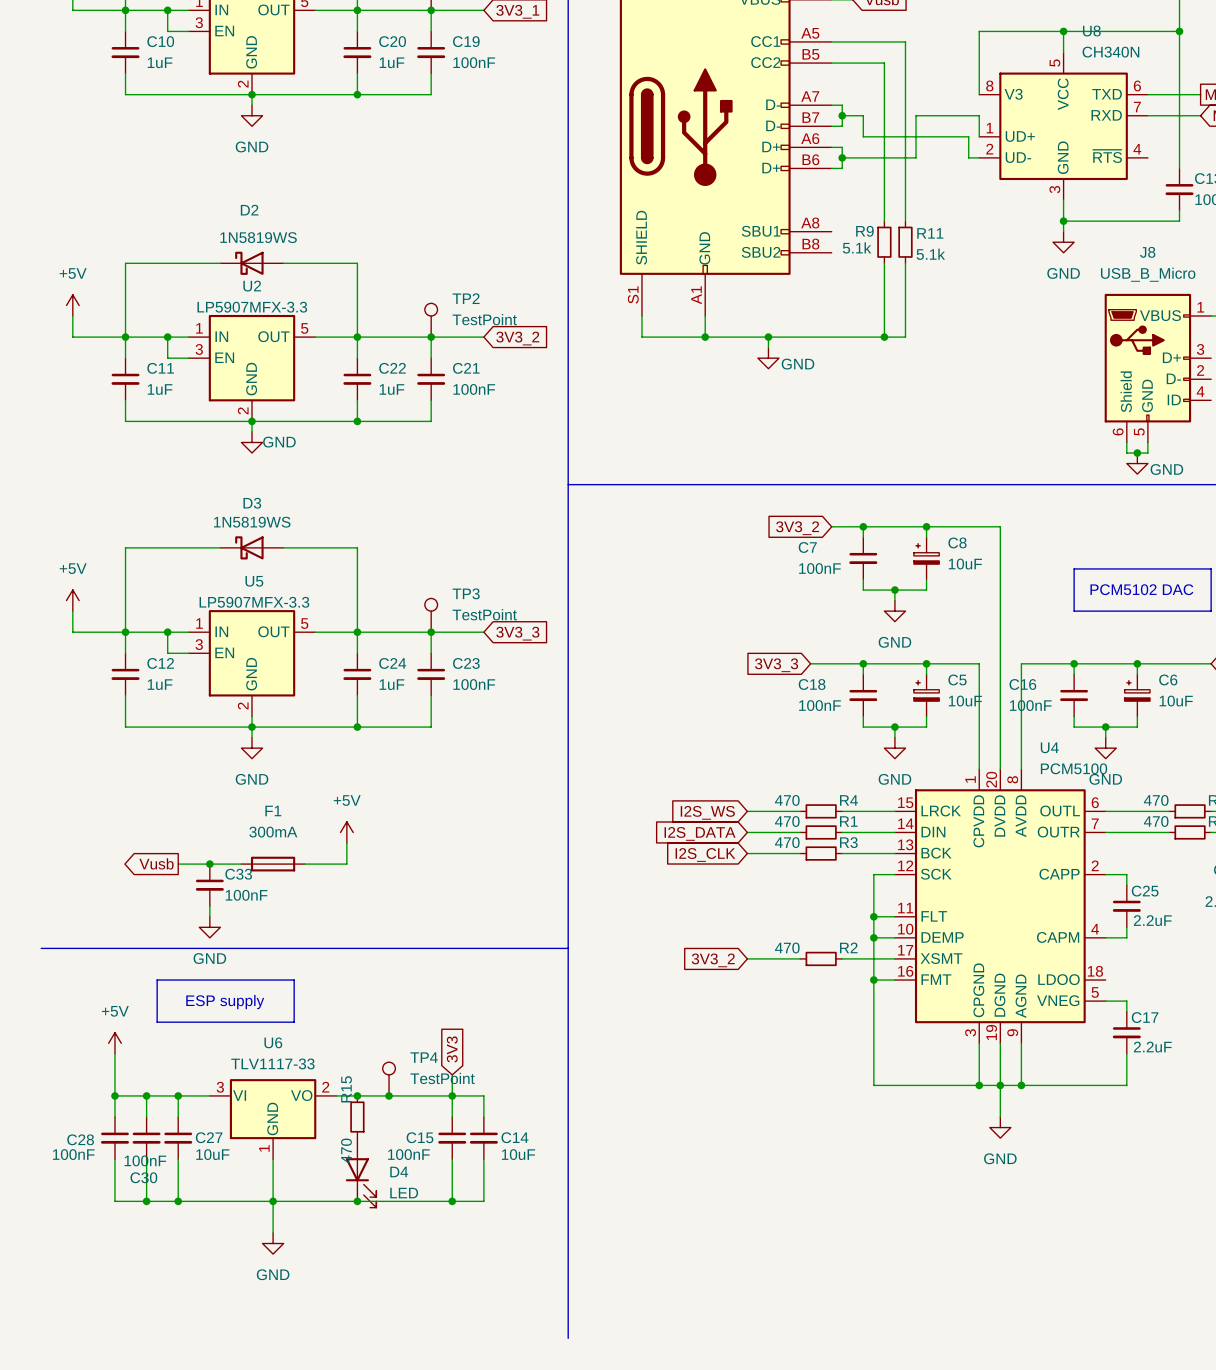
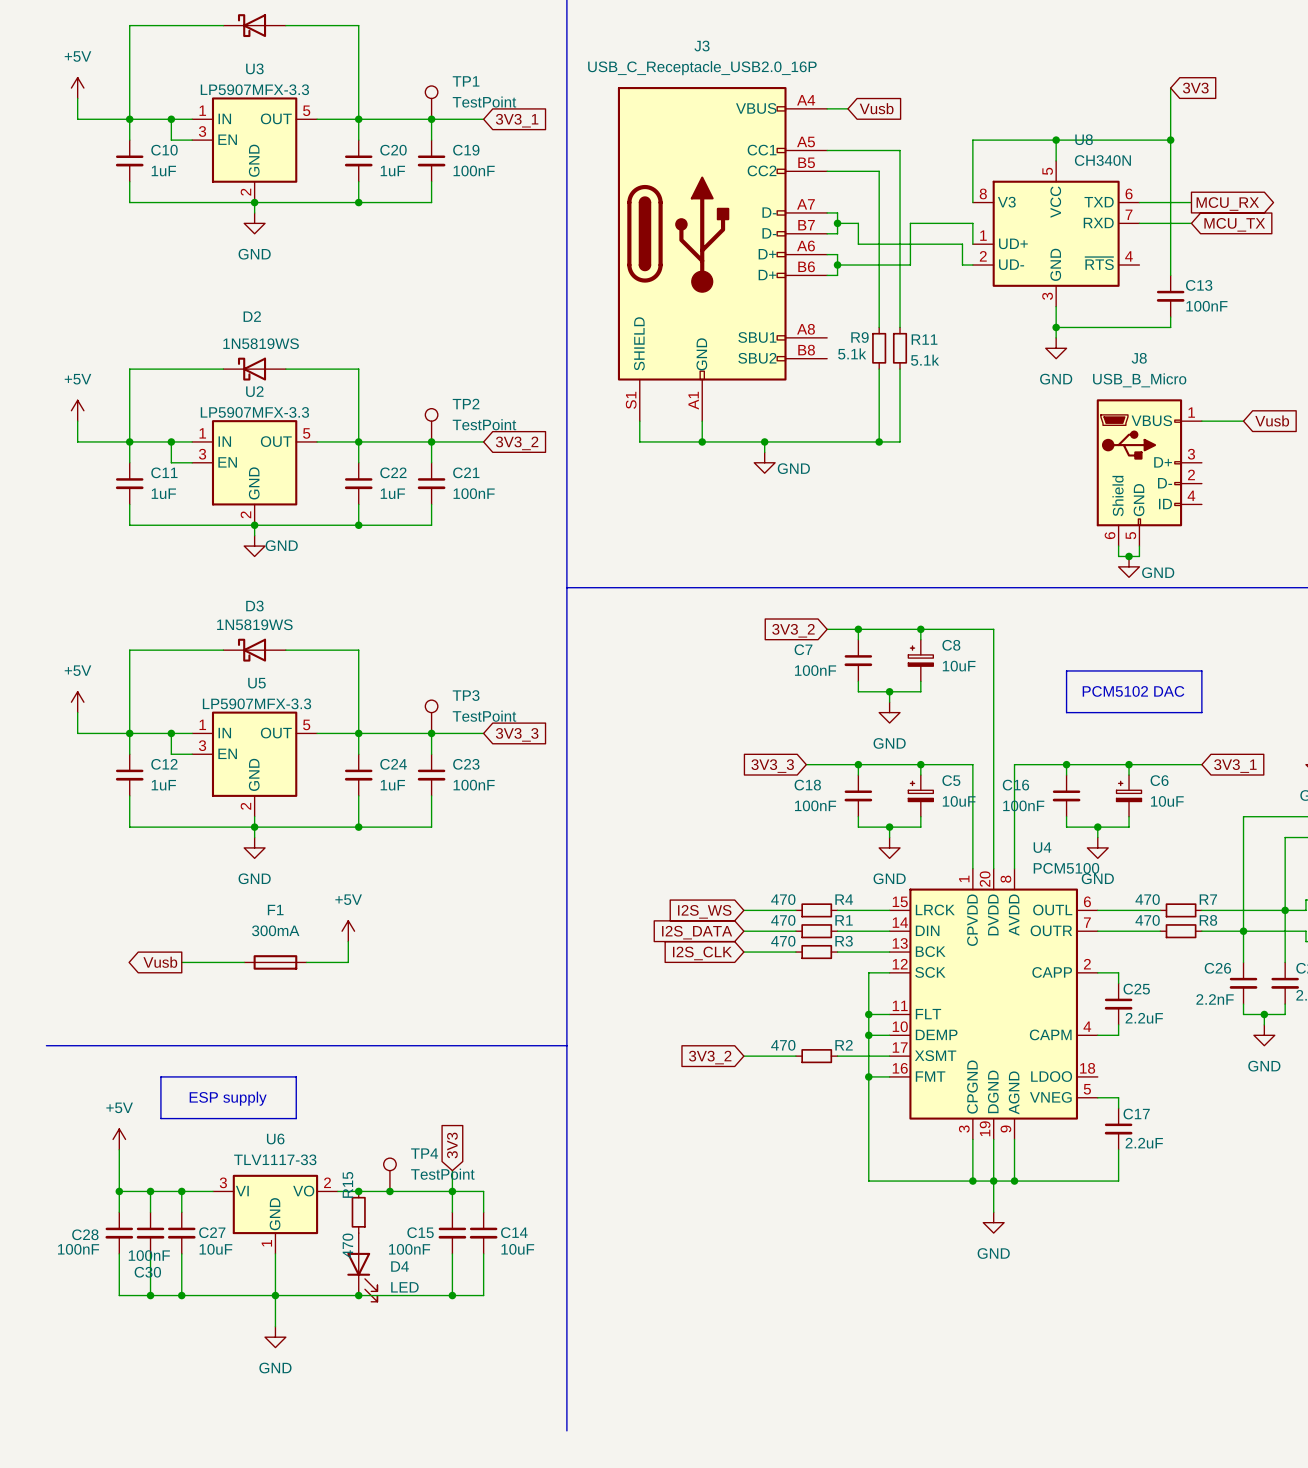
junction: (209, 864) -> none
C33: 100nF (209, 885) -> none
wire: (209, 906) (209, 916) -> none
power symbol: GND (209, 927) -> none

